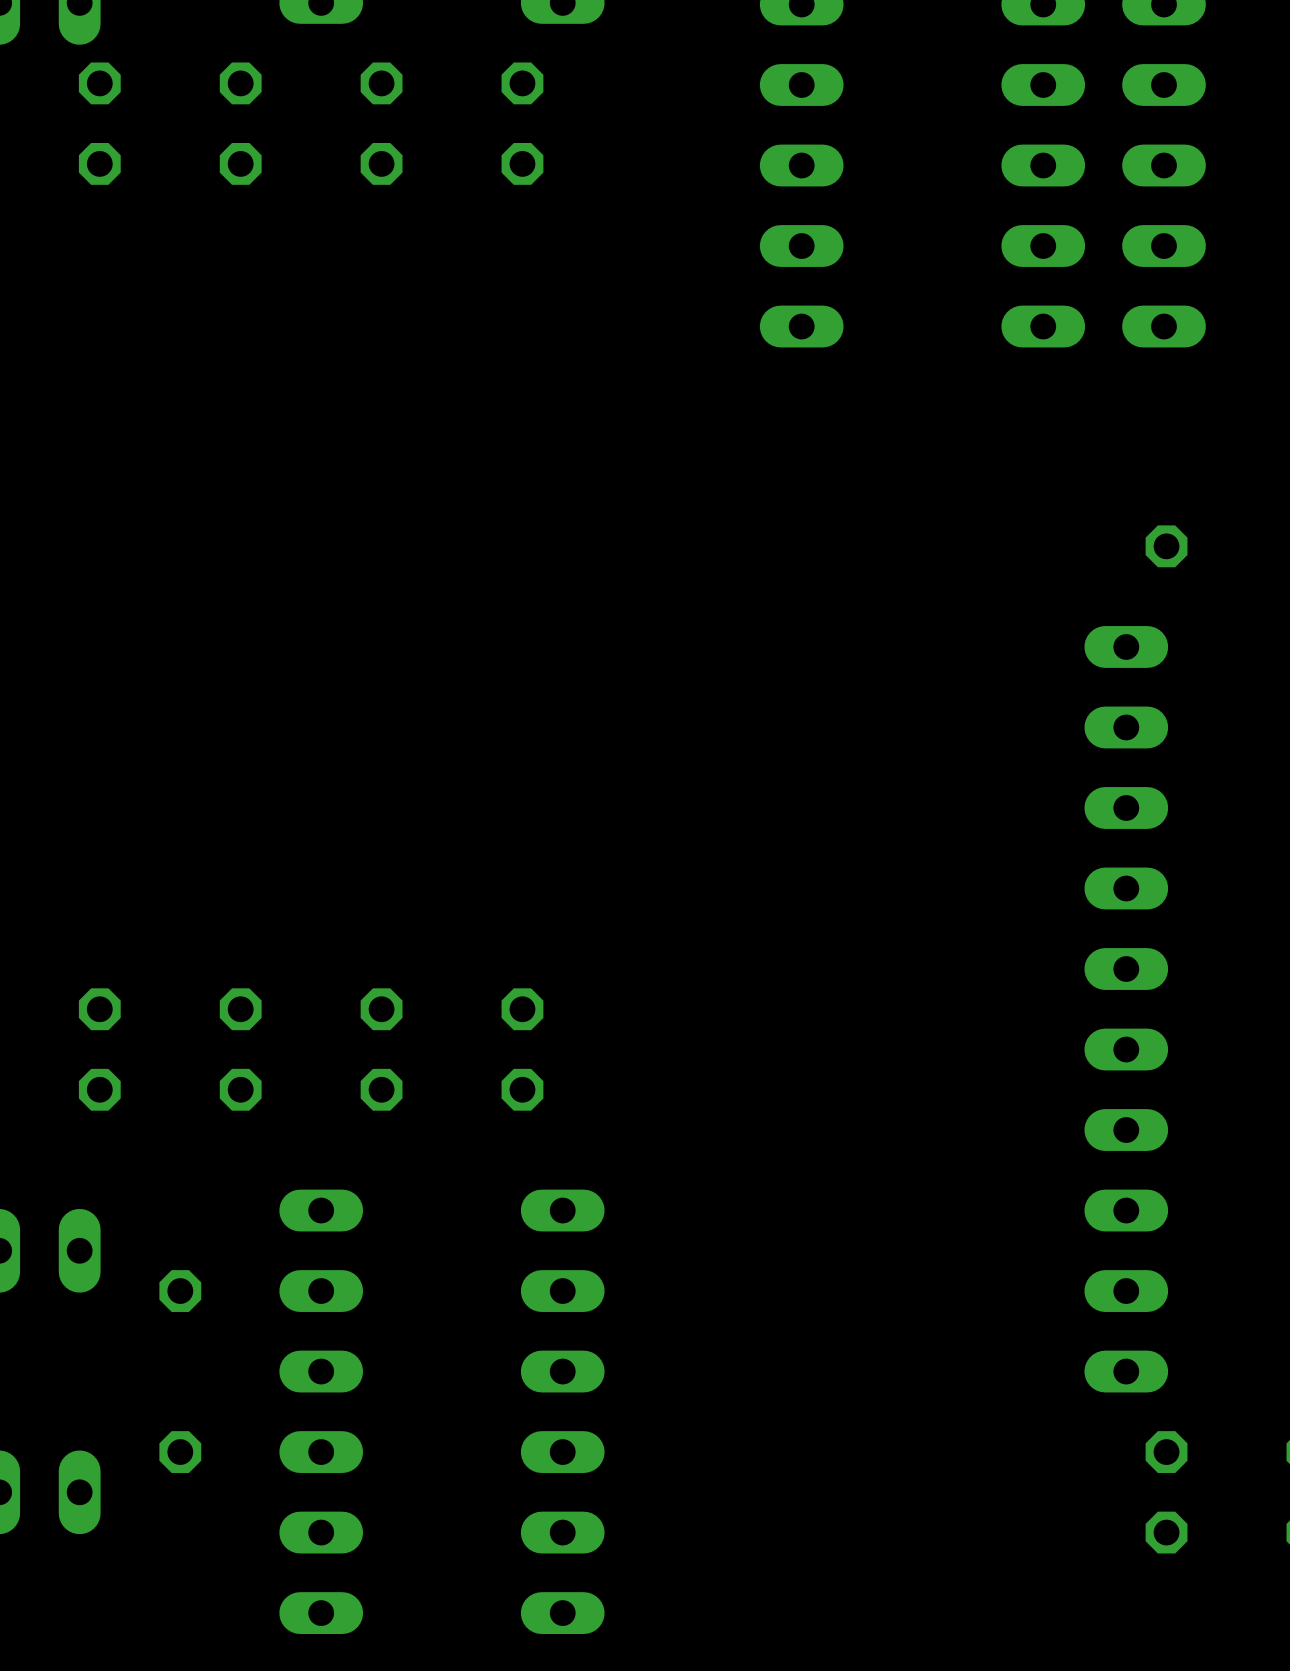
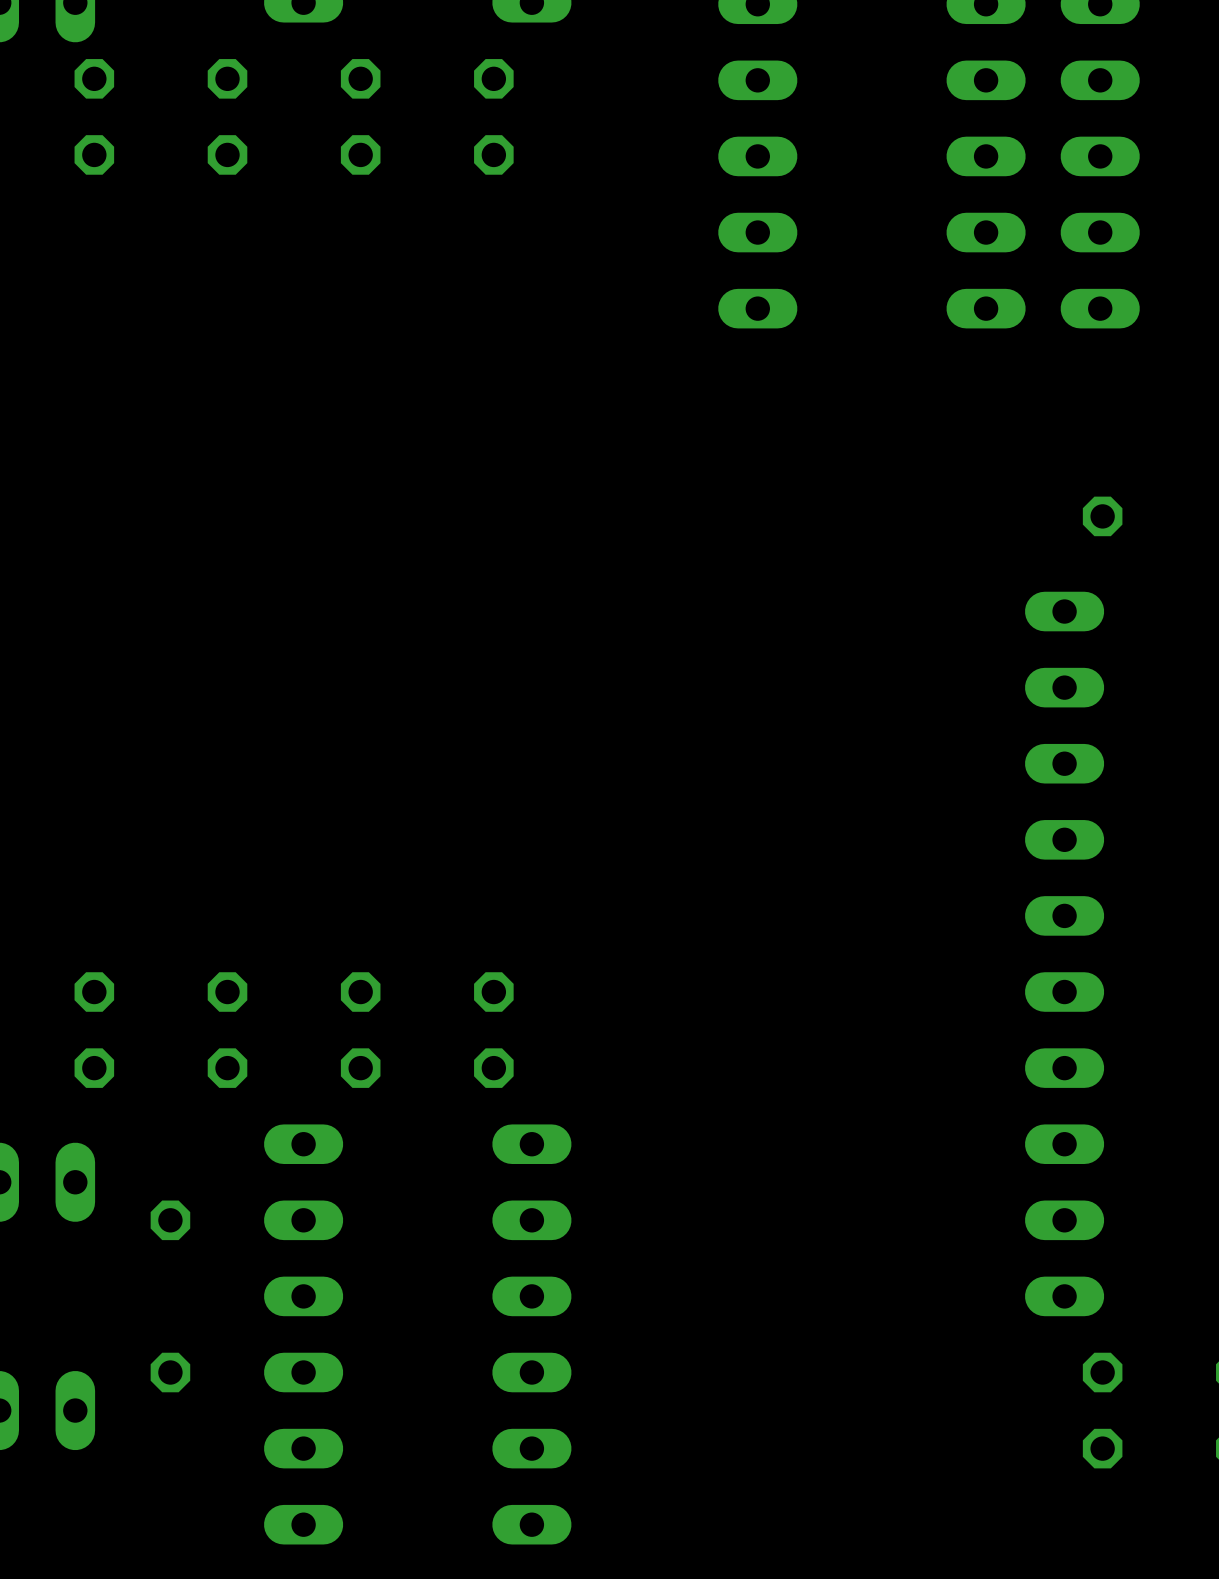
part position: (99, 1049) -> (94, 1030)
part position: (240, 1049) -> (227, 1030)
part position: (381, 1049) -> (360, 1030)
part position: (522, 1049) -> (493, 1030)

